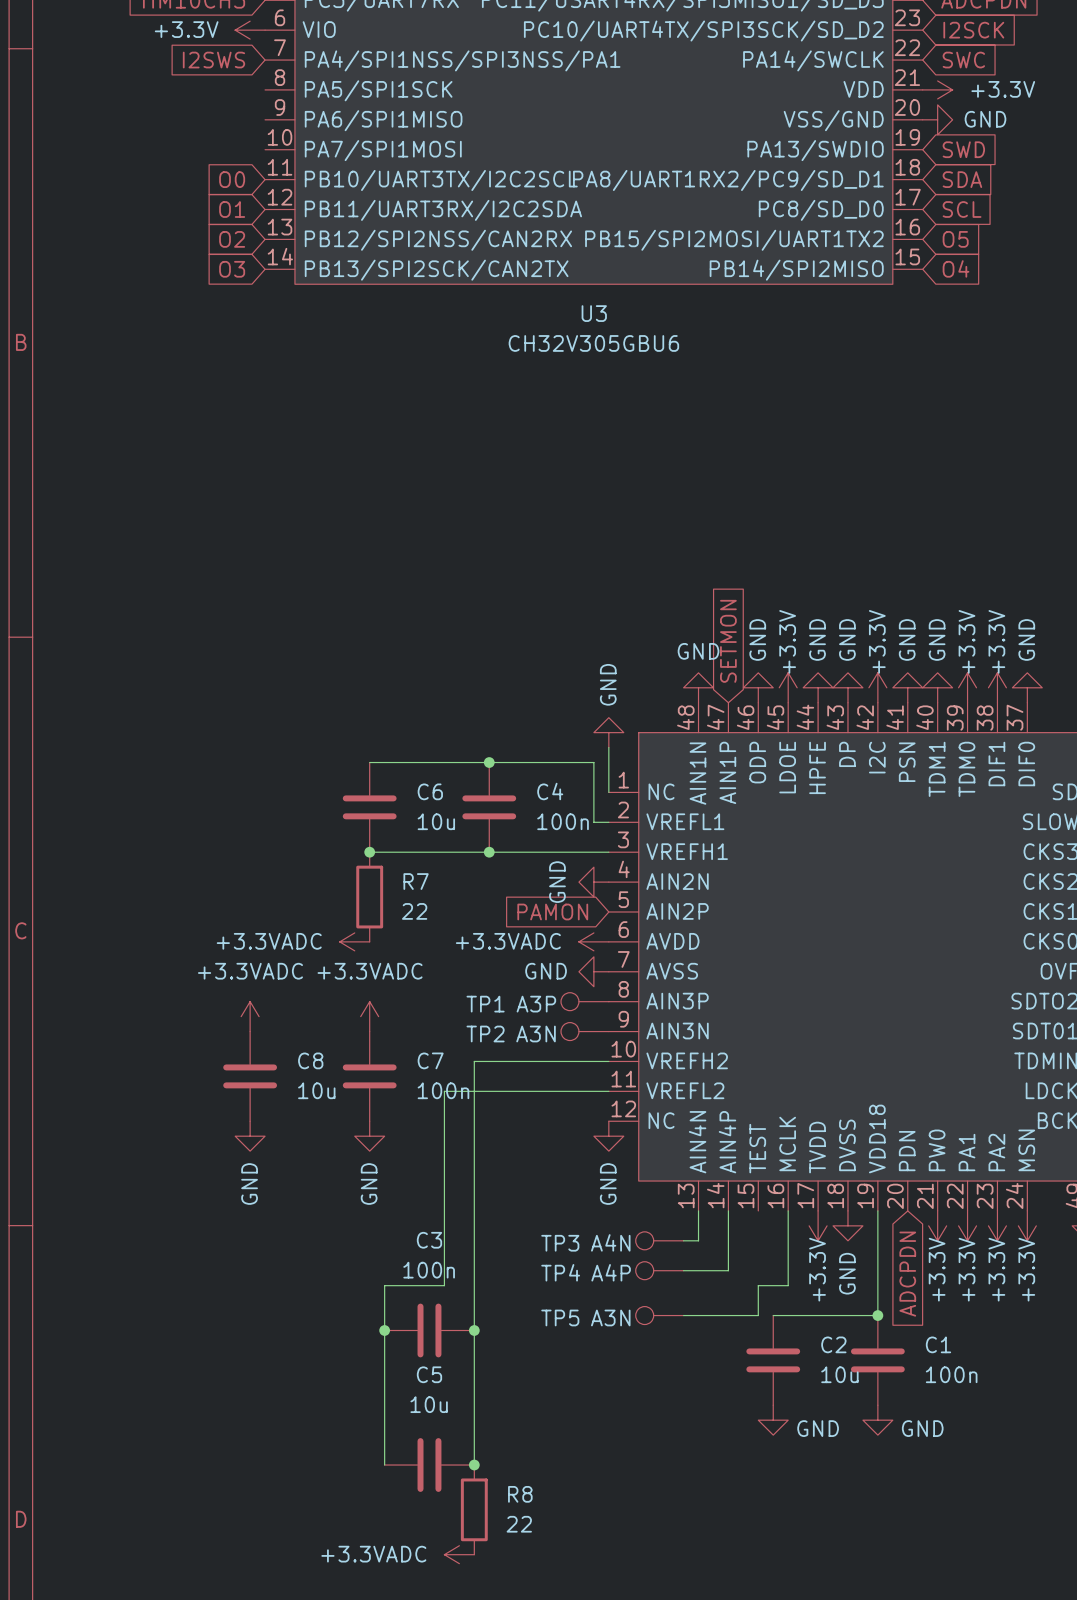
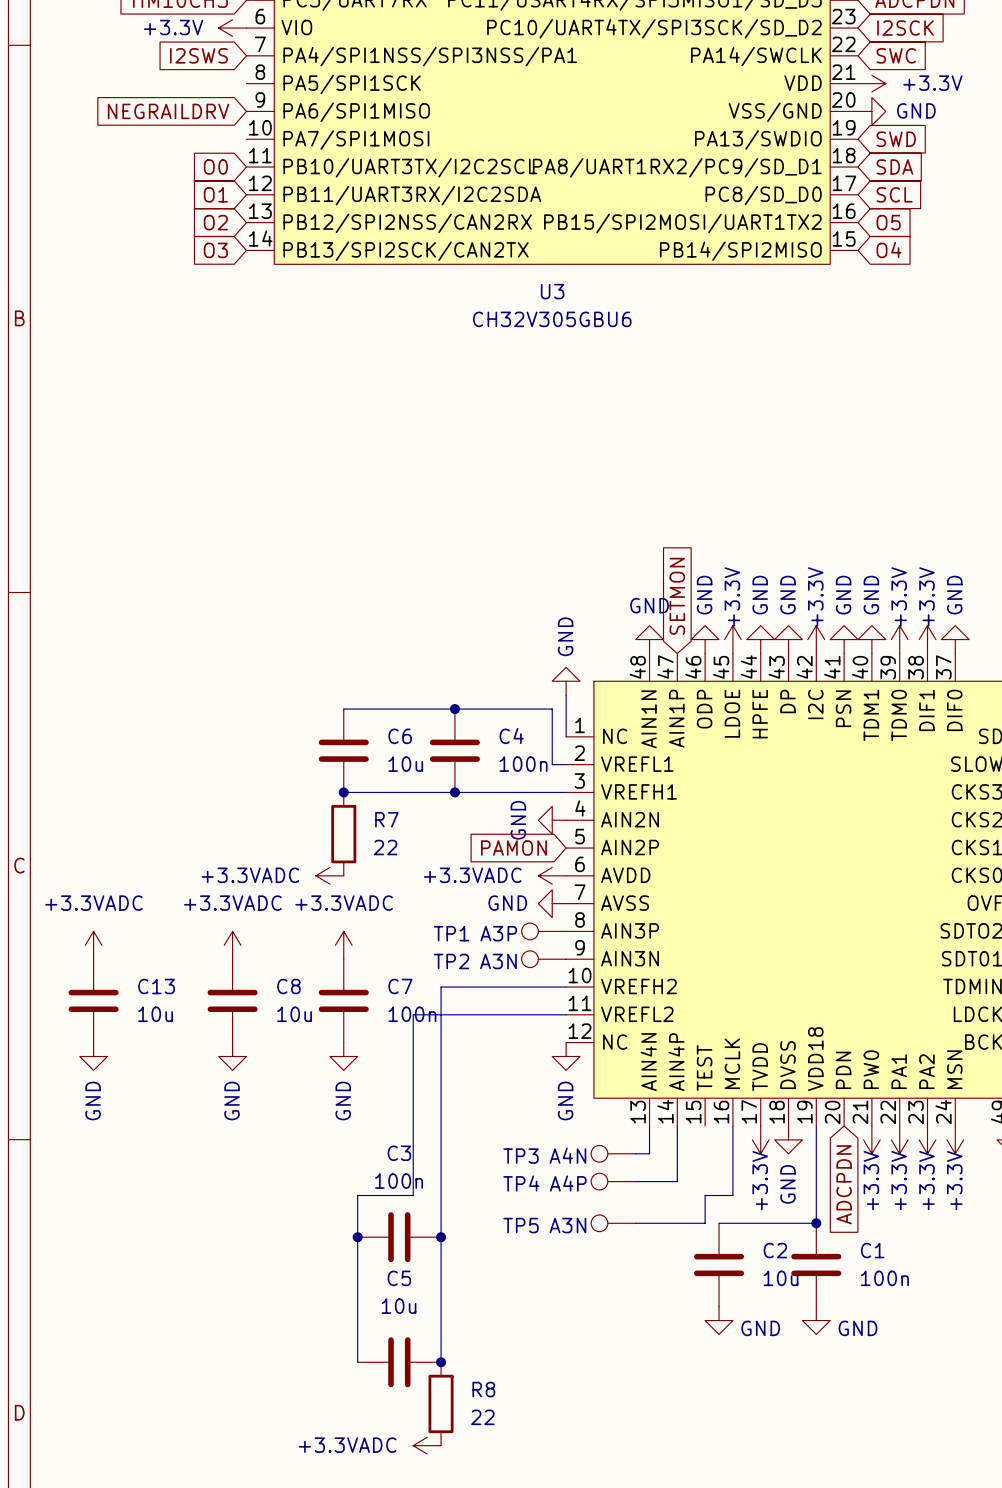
global label: none -> NEGRAILDRV (168, 111)
power symbol: none -> +3.3VADC (93, 945)
C13: none -> 10u (93, 1000)
power symbol: none -> GND (93, 1056)

